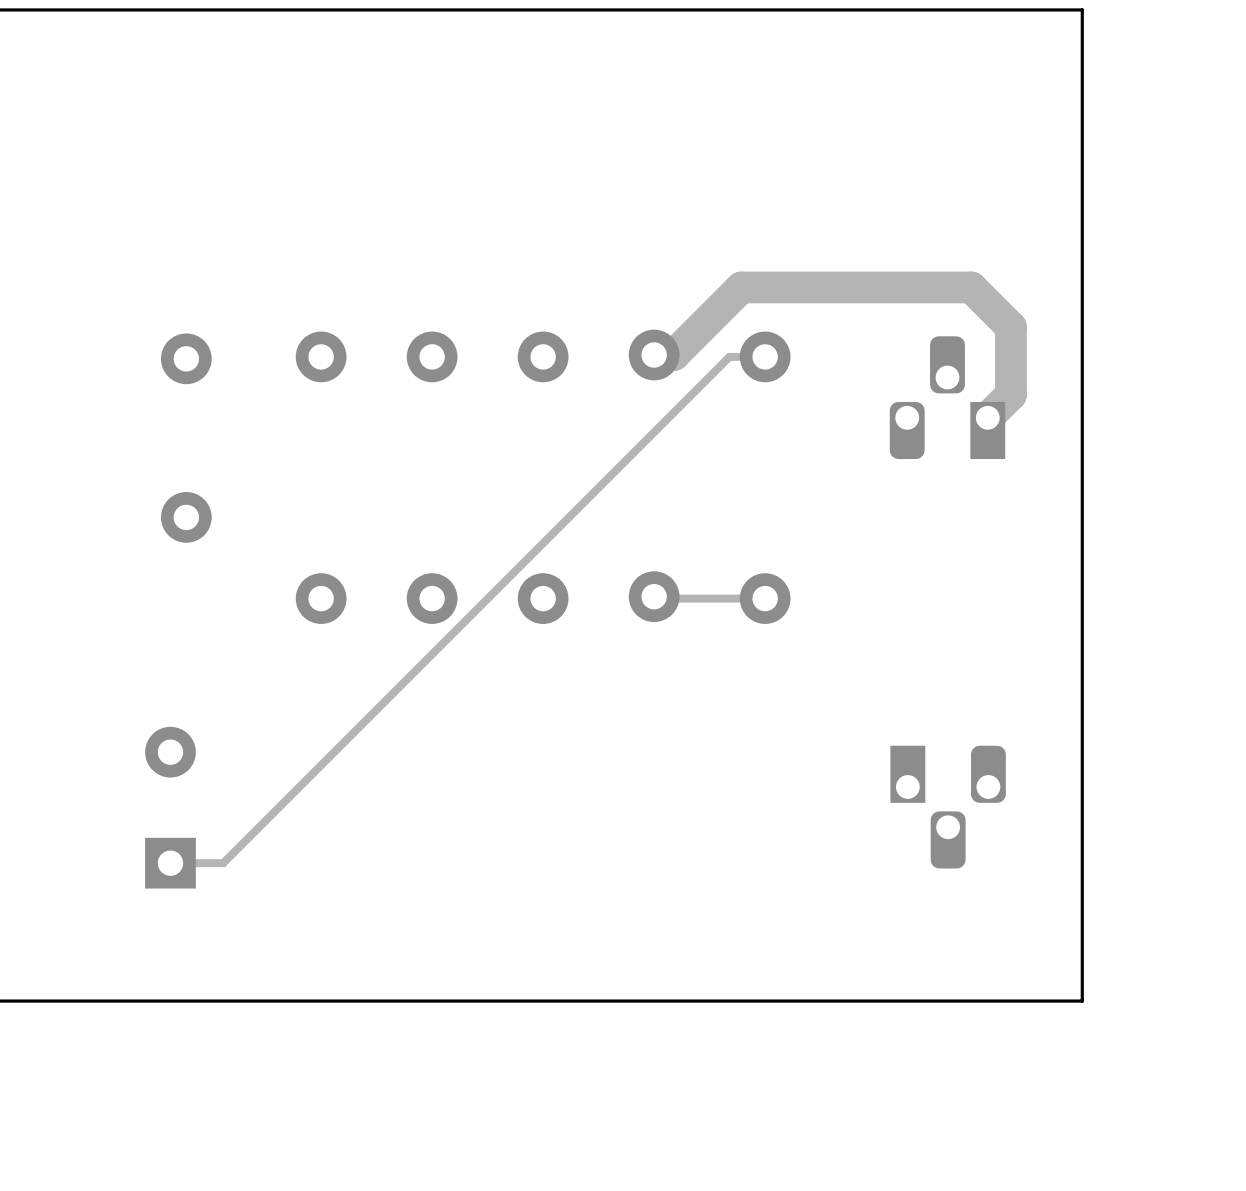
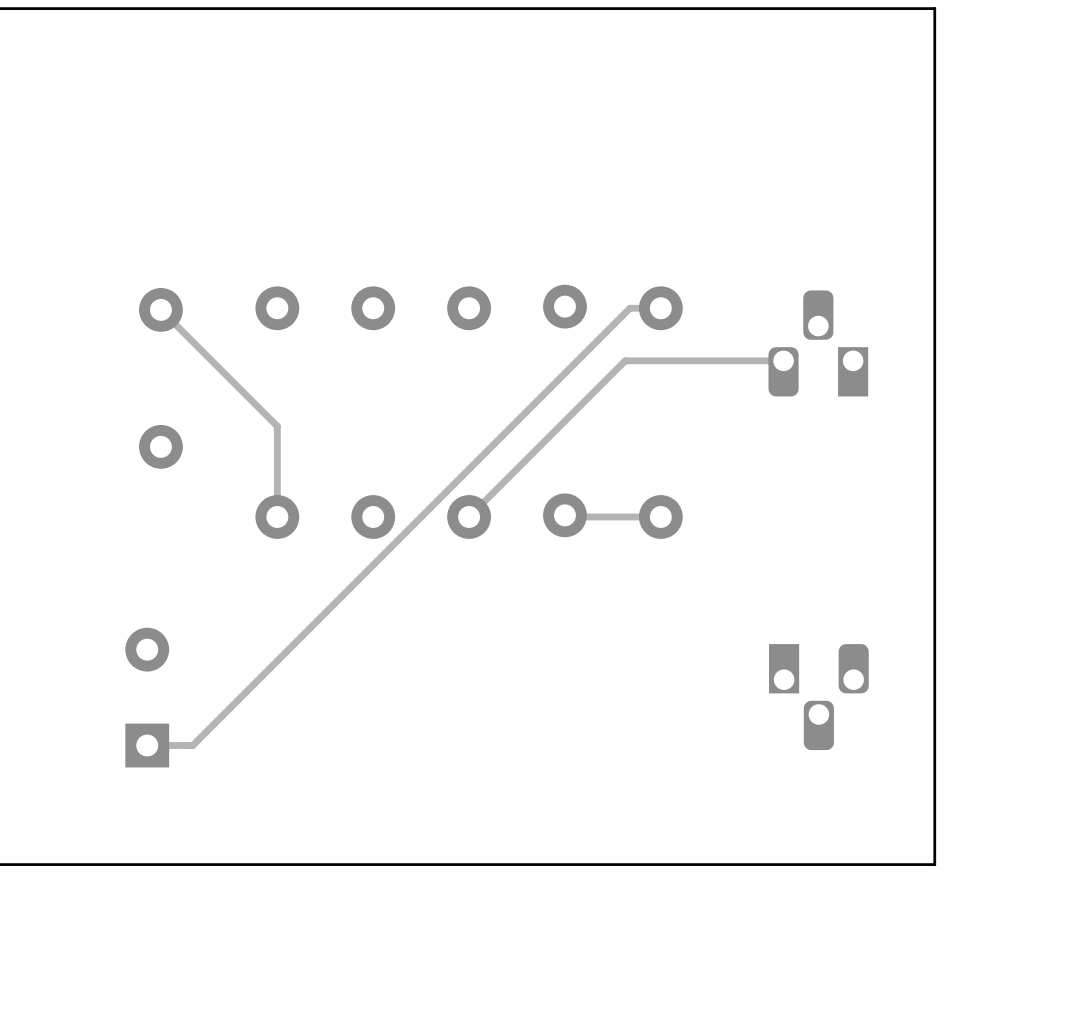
track: (654, 355) (673, 355) (741, 287) (971, 287) (1010, 327) (1010, 394) (987, 417) -> none
track: none -> (160, 309) (277, 426) (277, 516)
track: none -> (783, 360) (625, 360) (469, 516)

